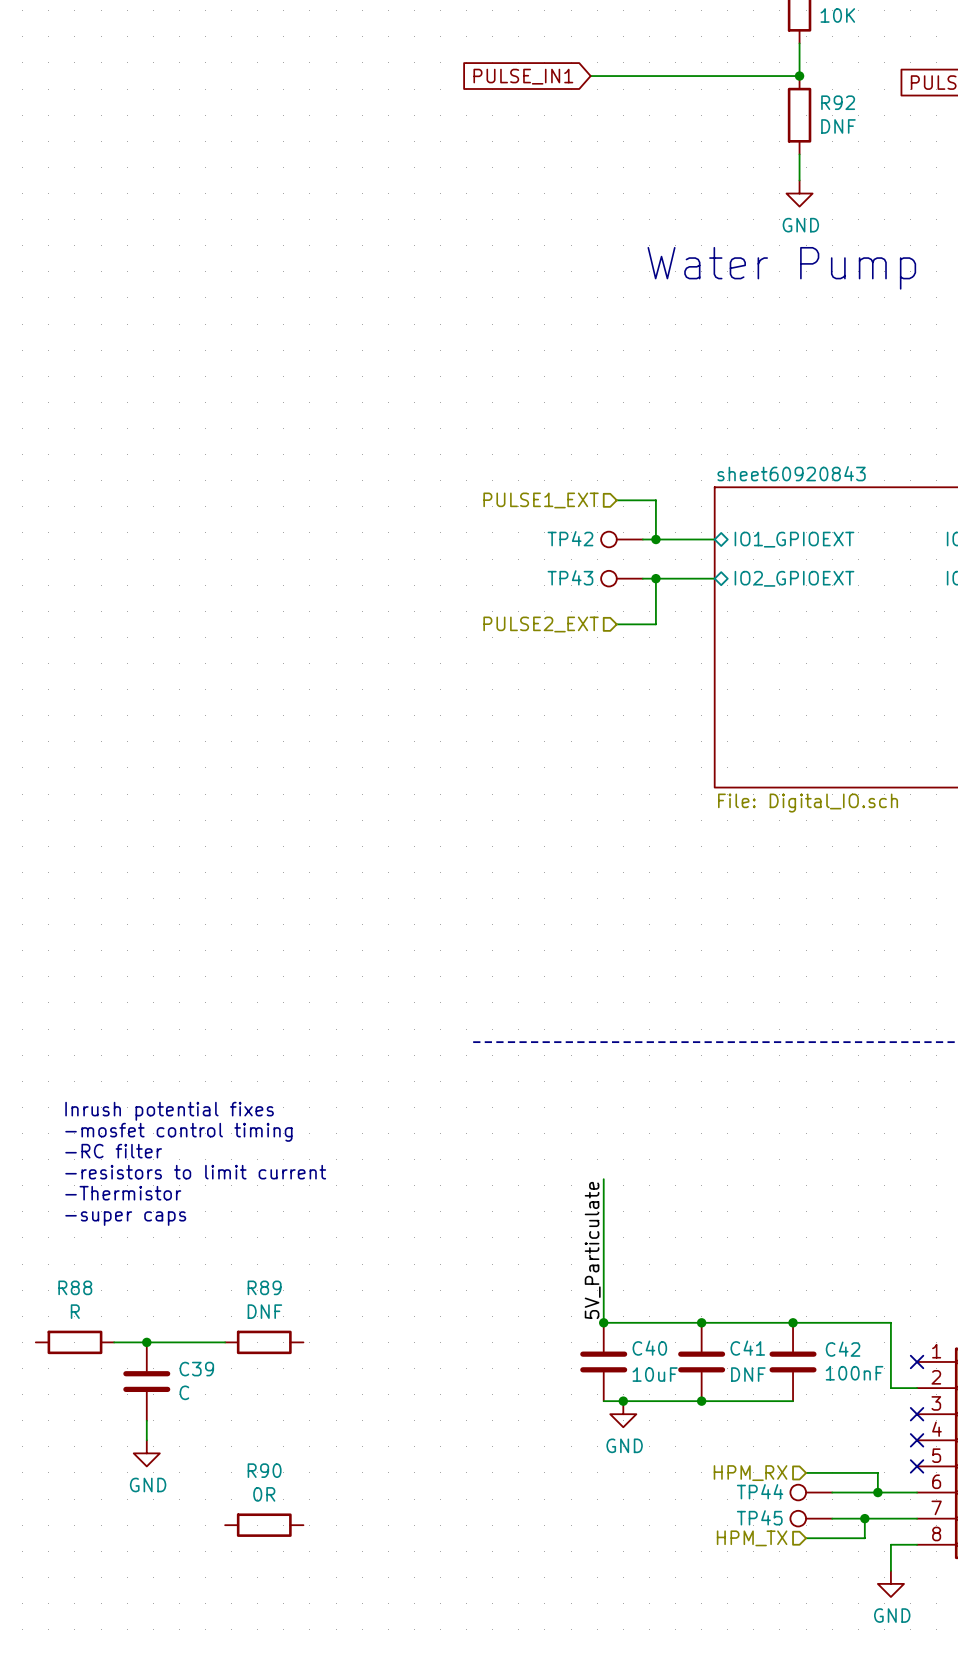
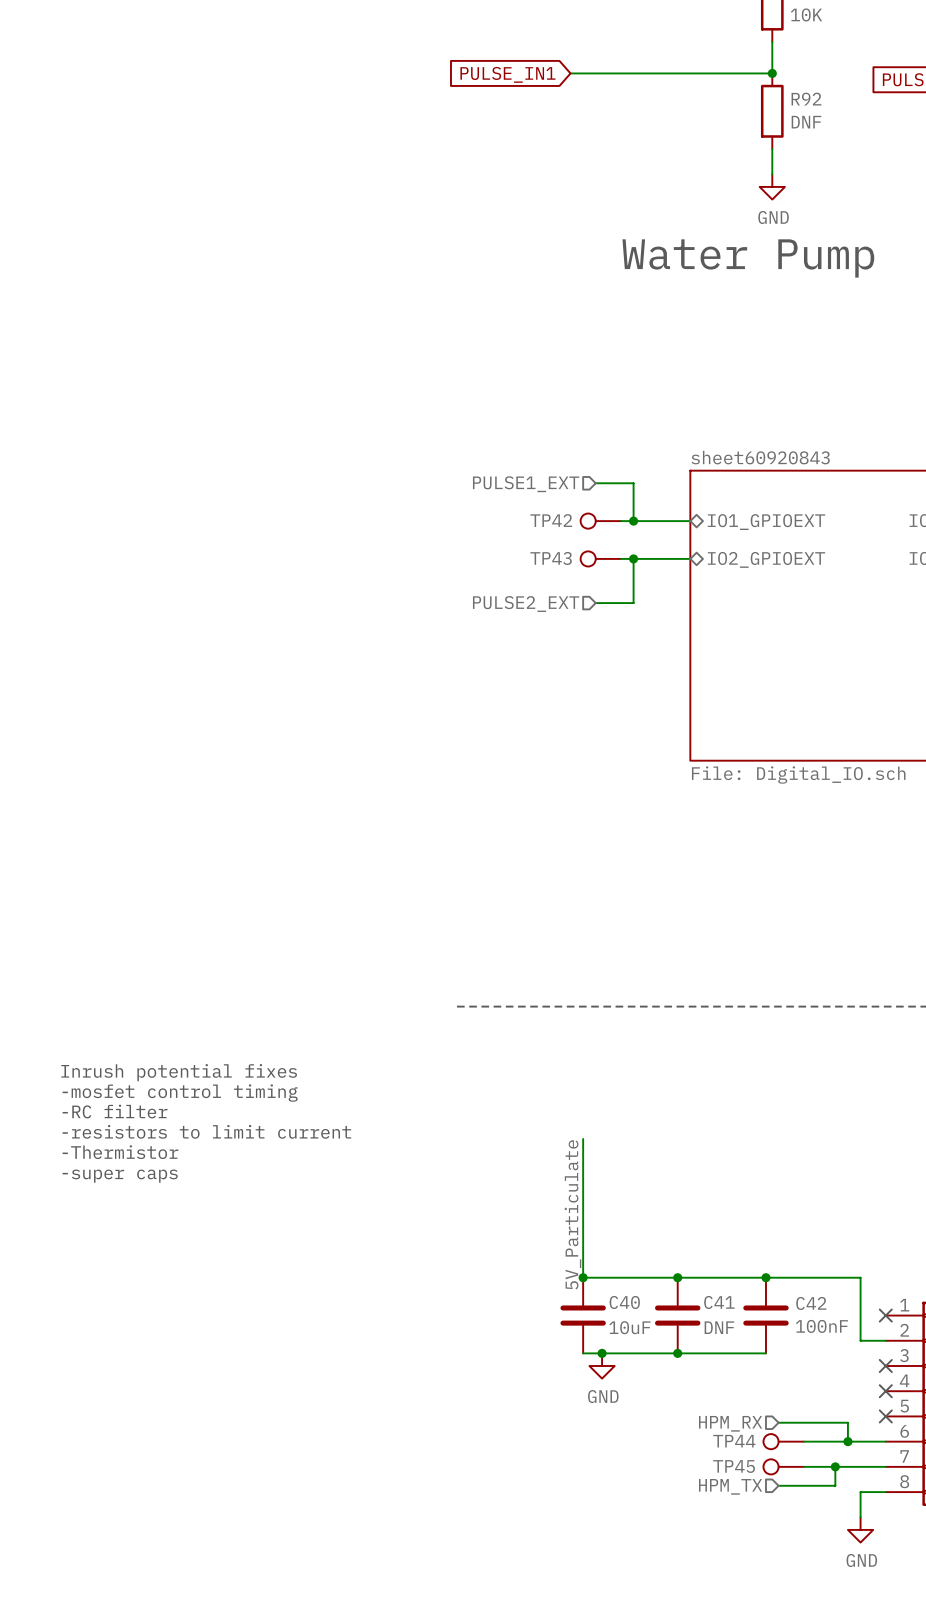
R88: R (74, 1342) -> none
wire: (114, 1342) (225, 1342) -> none
junction: (146, 1342) -> none
R89: DNF (264, 1342) -> none
C39: C (146, 1381) -> none
wire: (146, 1420) (146, 1440) -> none
power symbol: GND (146, 1453) -> none
R90: 0R (264, 1525) -> none

